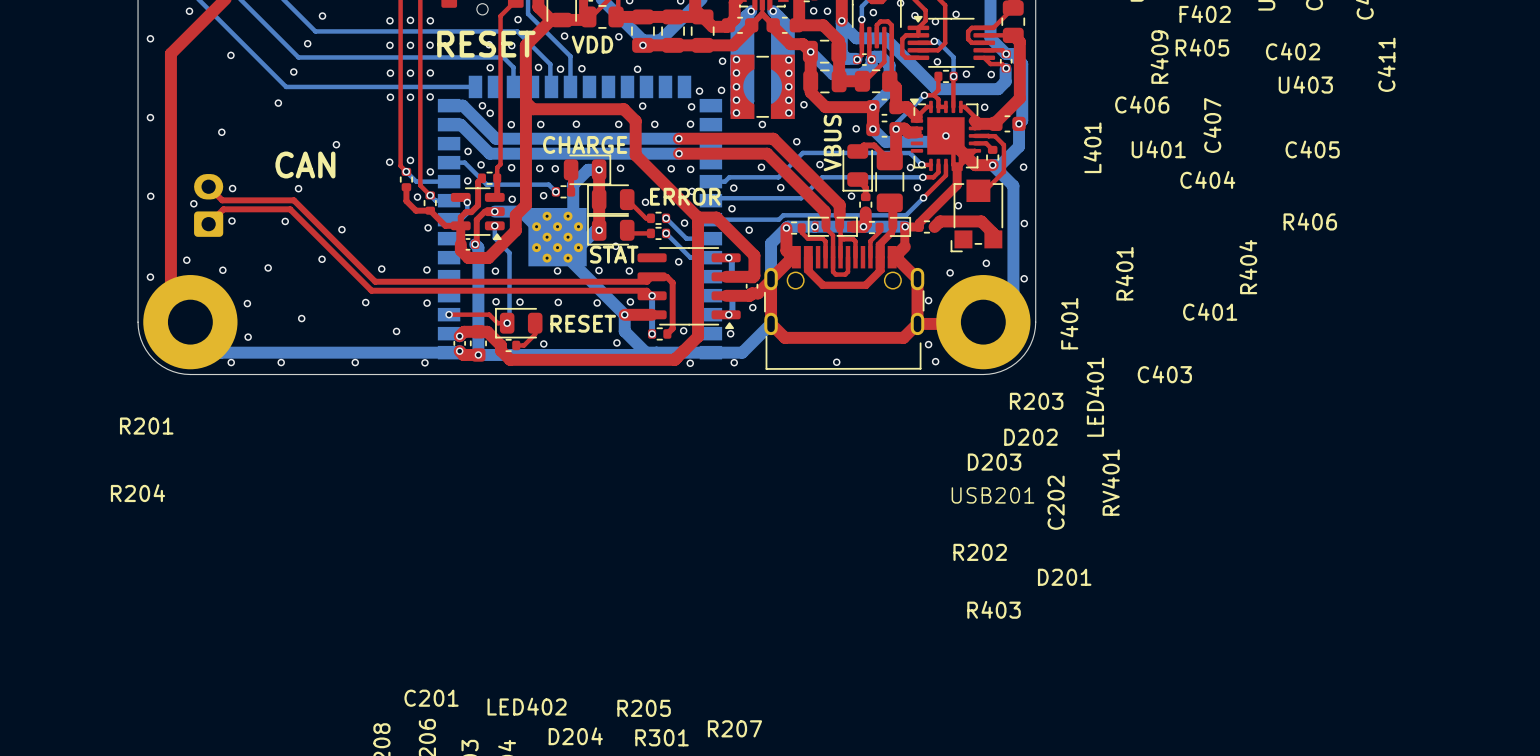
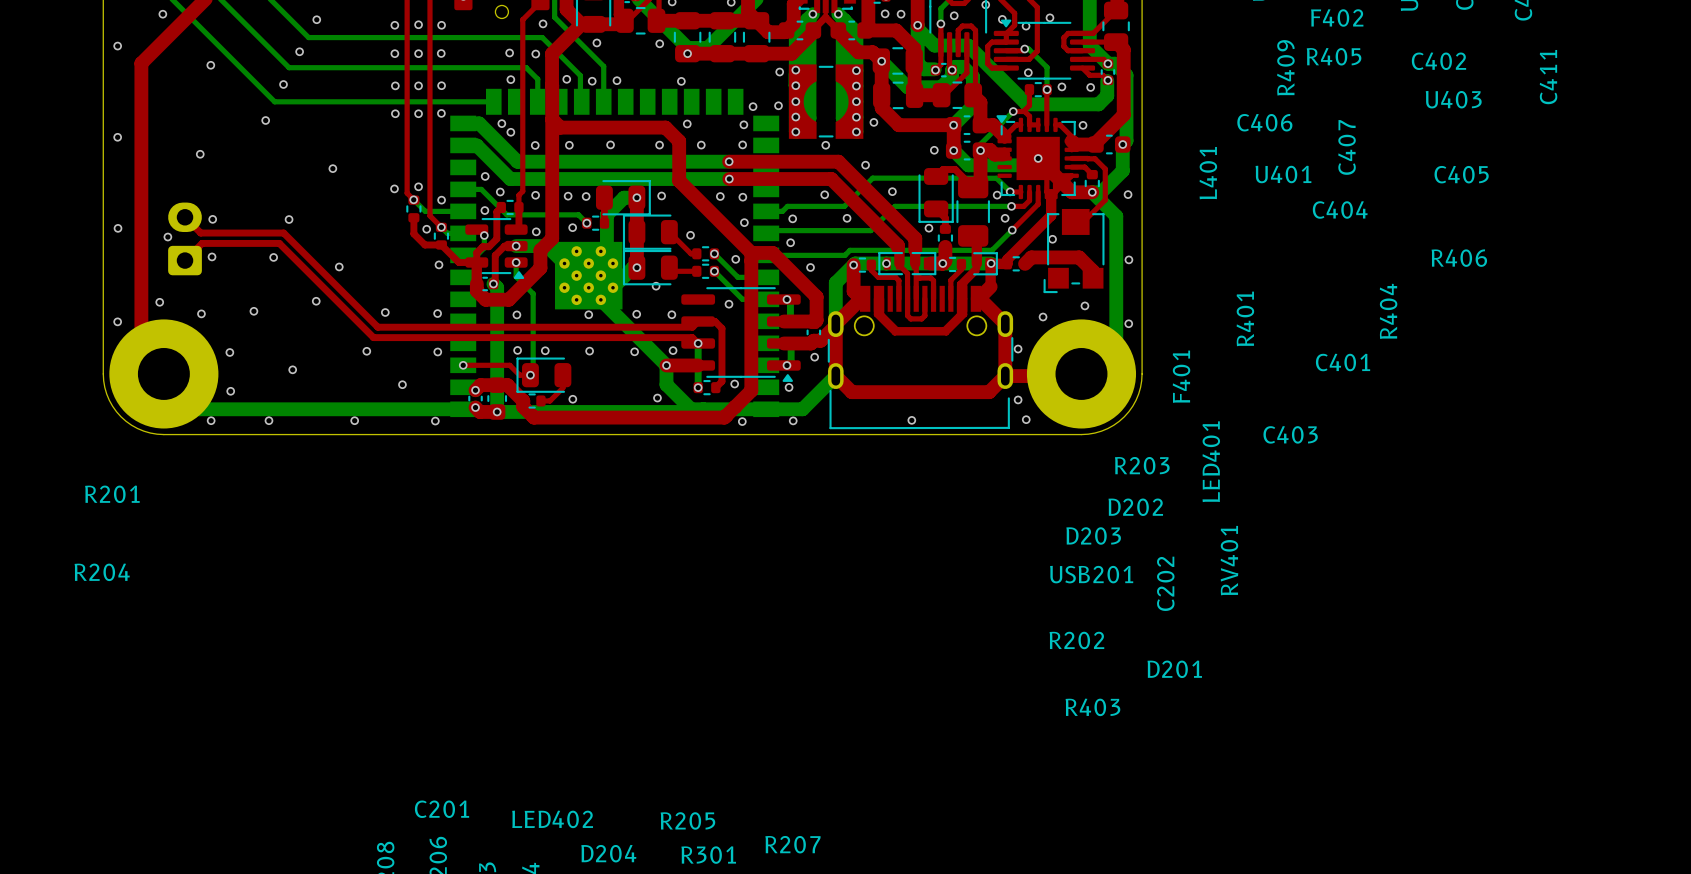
text: RESET (486, 44) -> none
text: VDD (592, 44) -> none
text: VBUS (832, 143) -> none
text: CHARGE (585, 144) -> none
text: CAN (305, 164) -> none
text: ERROR (685, 196) -> none
text: STAT (614, 254) -> none
text: RESET (583, 323) -> none

